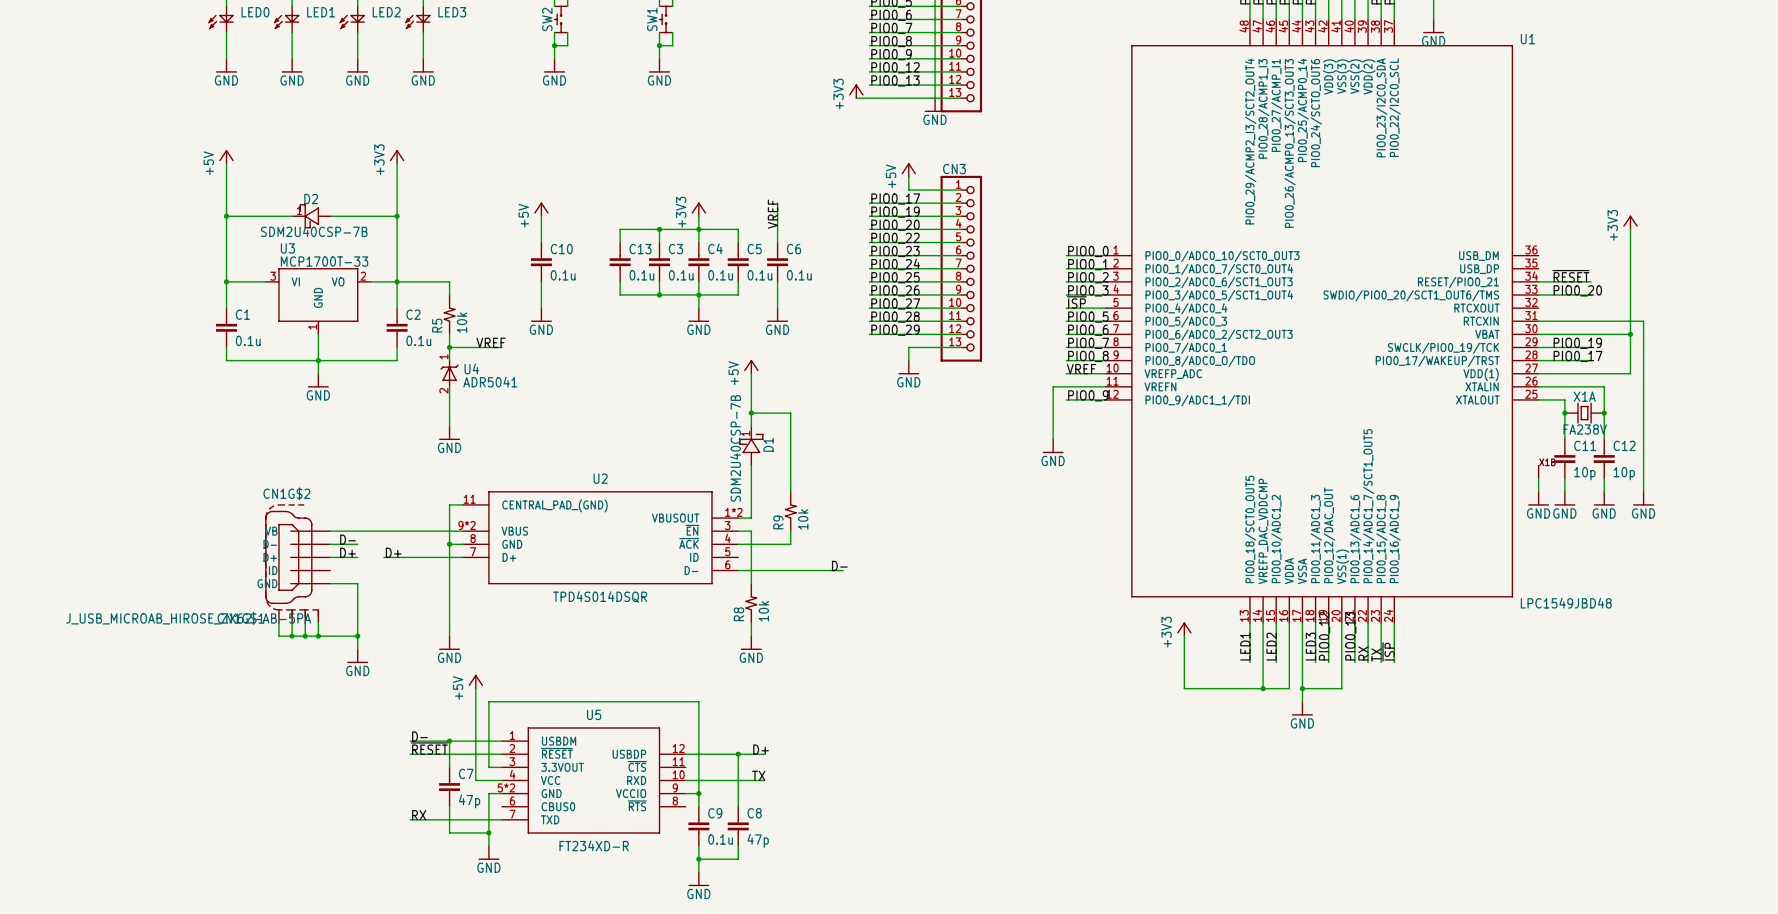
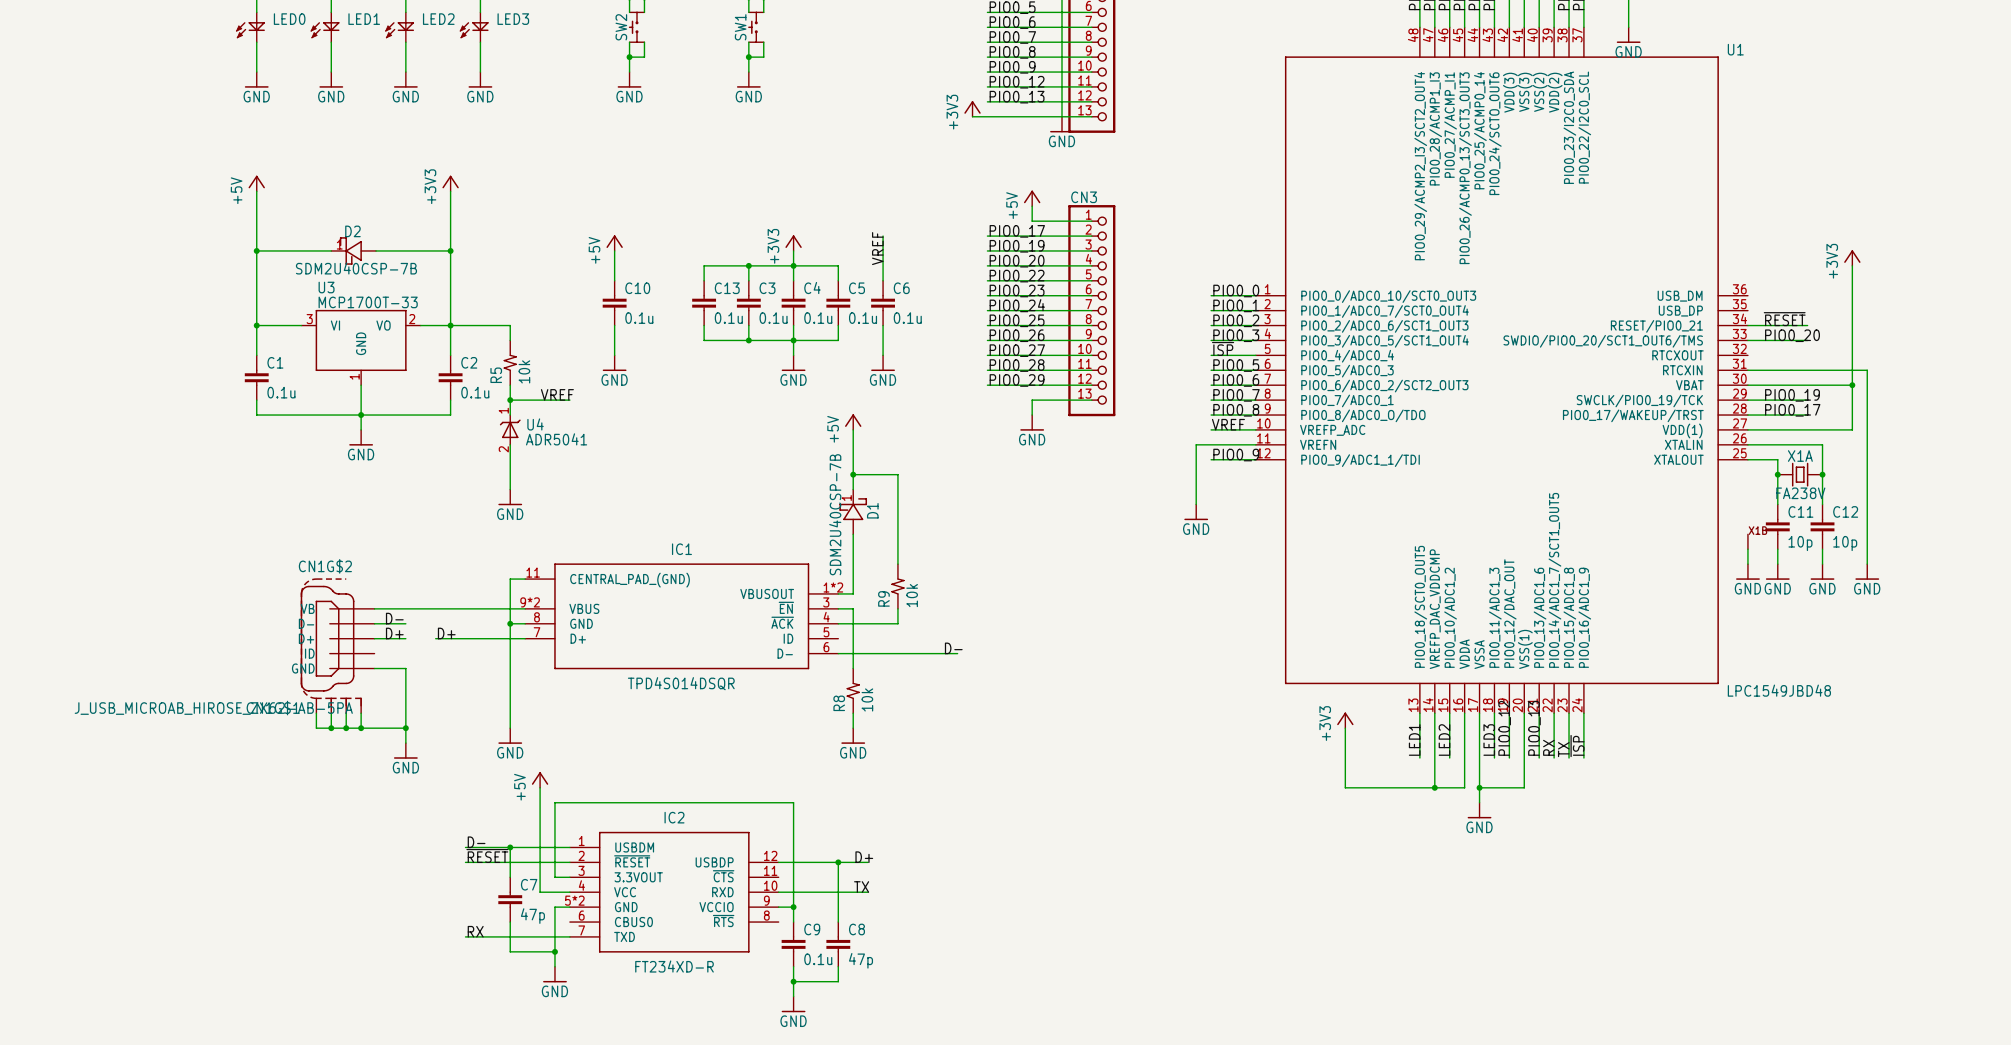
U2 name: U2 (600, 478) -> IC1 (681, 549)
U5 name: U5 (594, 714) -> IC2 (674, 817)

